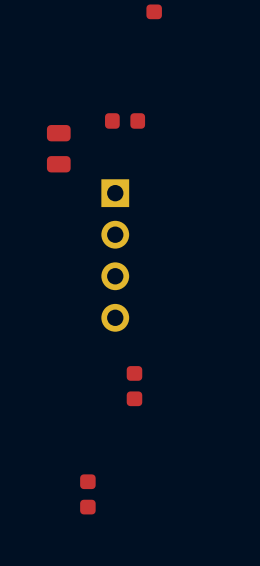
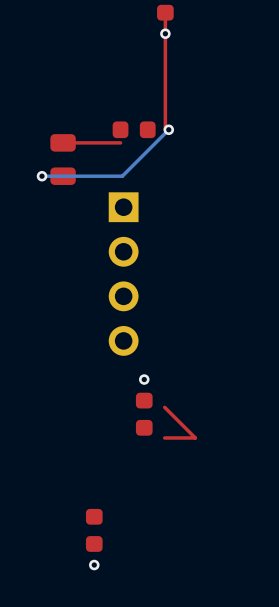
top track: none -> (165, 12) (165, 129)
via: none -> (165, 33)
bottom track: none -> (168, 129) (122, 176) (42, 176)
via: none -> (168, 129)
top track: none -> (120, 142) (63, 142)
via: none -> (42, 176)
via: none -> (144, 379)
top track: none -> (164, 407) (195, 437) (164, 437)
via: none -> (94, 565)

